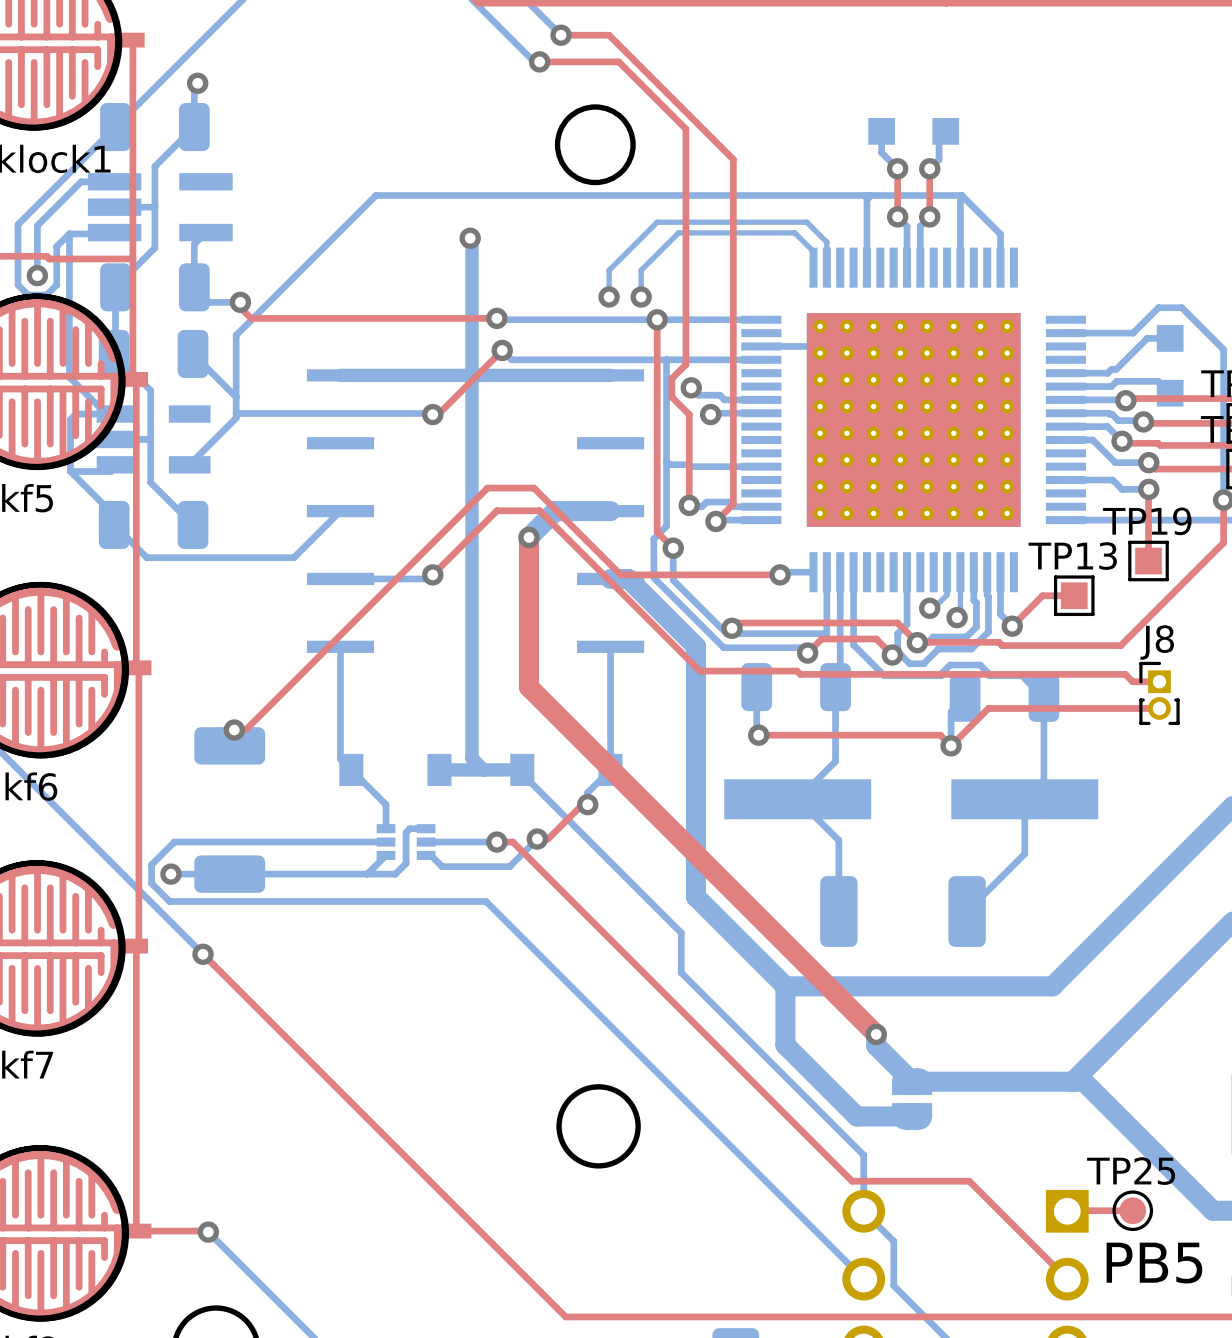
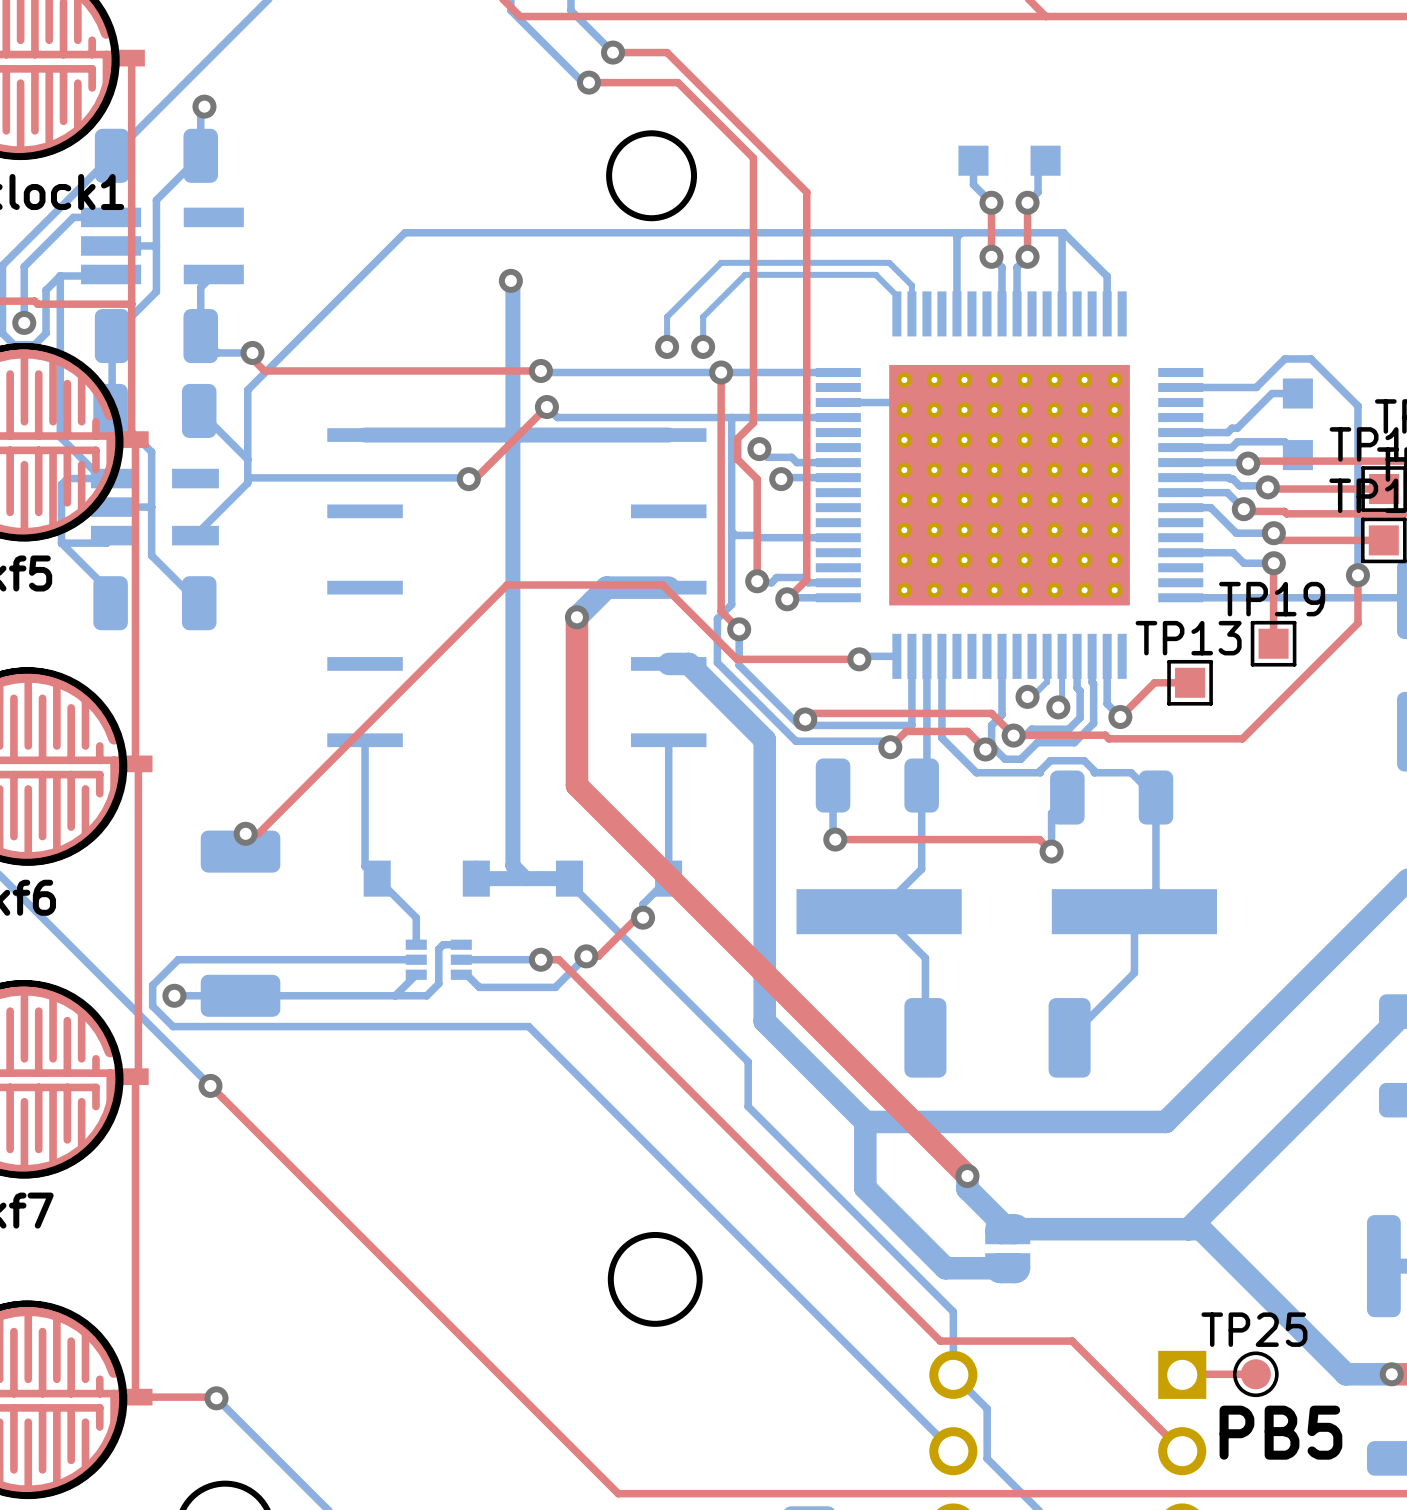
top track: (466, 508) (487, 488) (533, 488) (620, 574) (671, 574) -> (507, 585) (662, 585) (736, 659)
bottom track: (340, 511) (293, 557) (146, 557) (114, 524) -> none
bottom track: (432, 574) (428, 578) (340, 578) -> none
top track: (432, 574) (496, 510) (539, 510) (699, 671) (797, 671) (800, 674) (1125, 674) (1132, 681) (1159, 681) -> none
via: (432, 574) -> none
J8: (1159, 693) -> none
top track: (1159, 708) (988, 708) (951, 745) -> none

